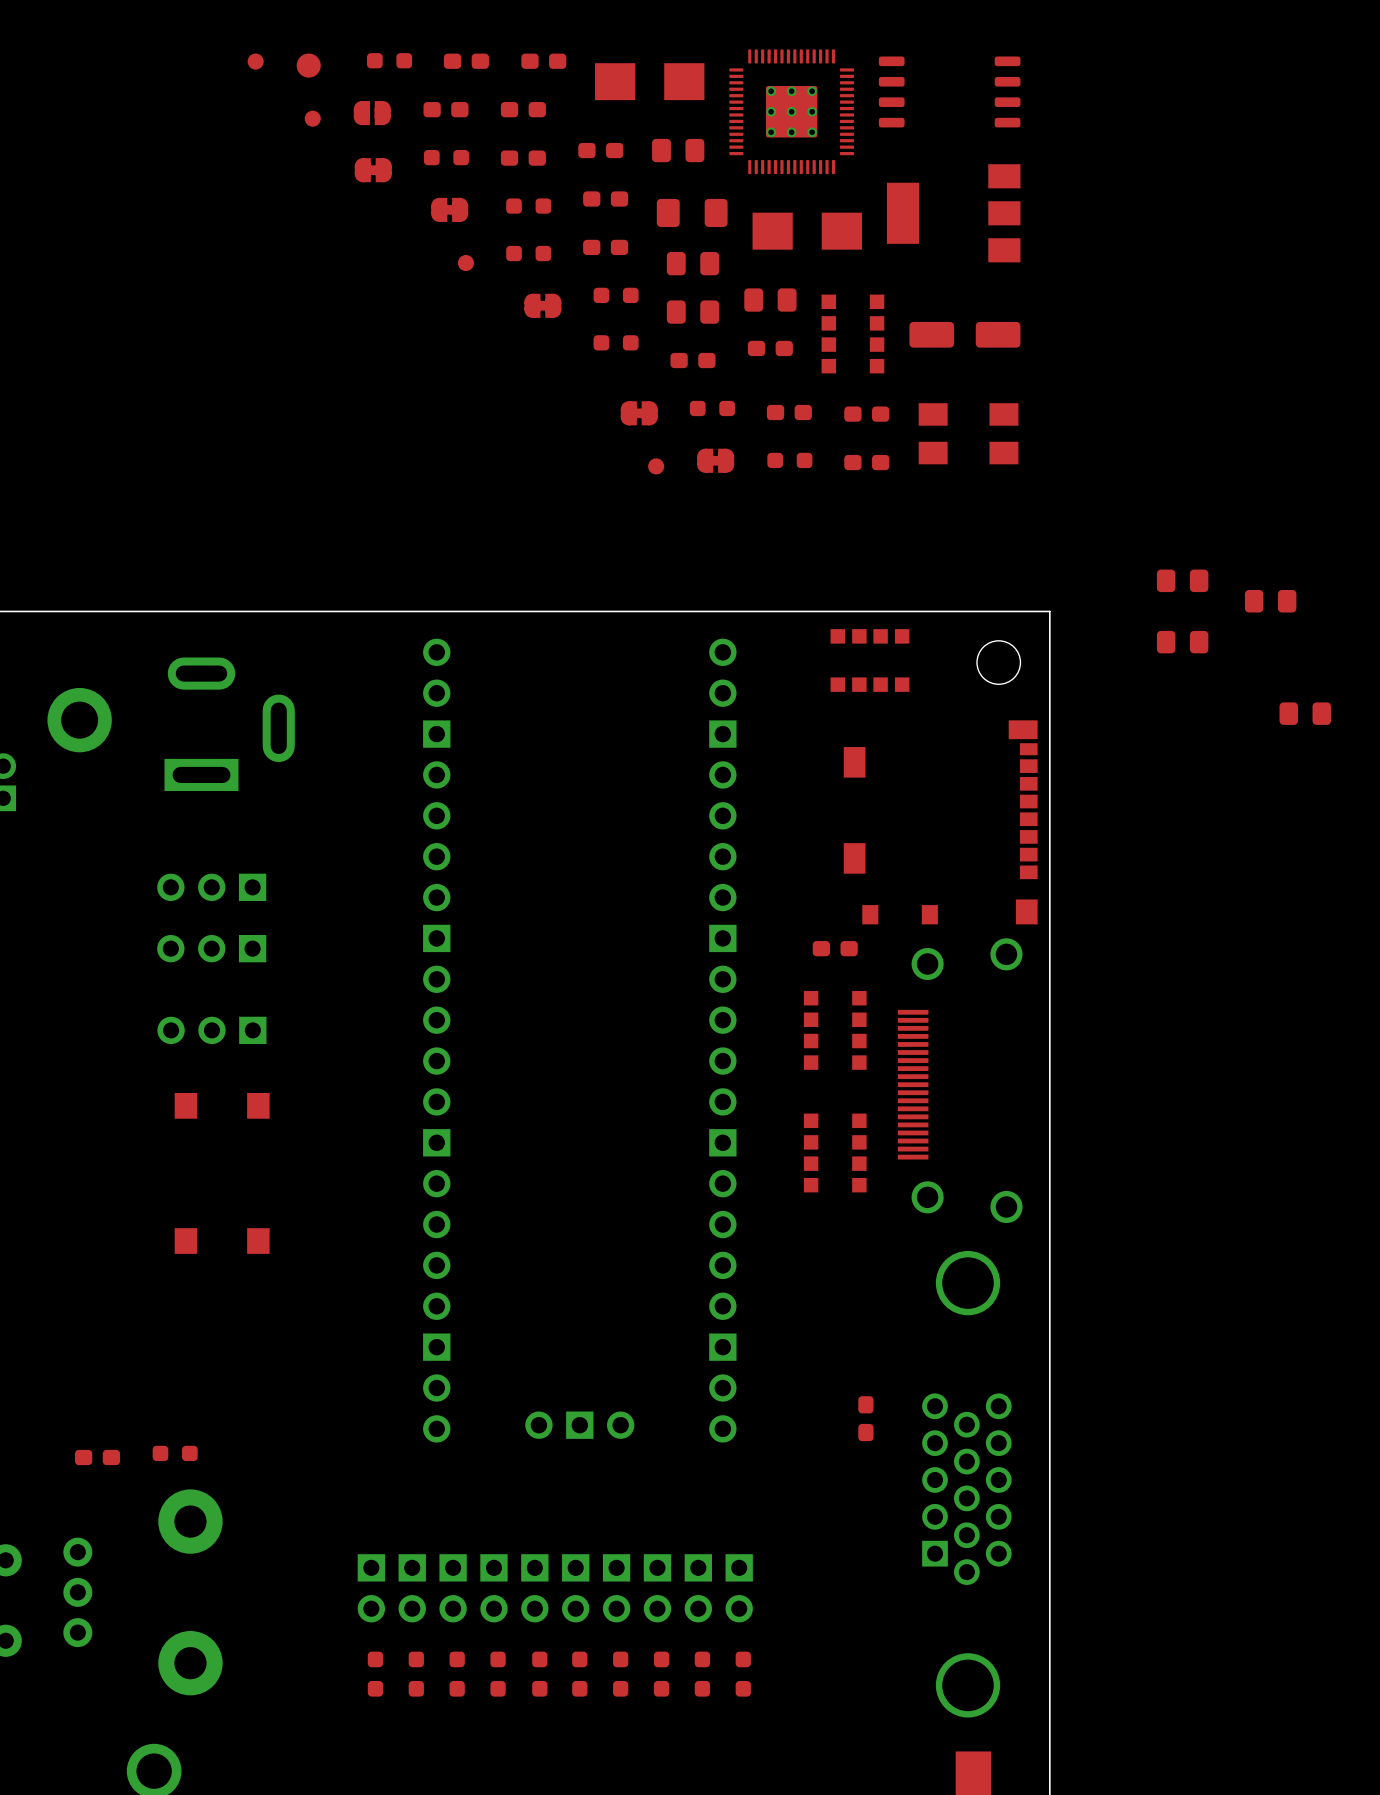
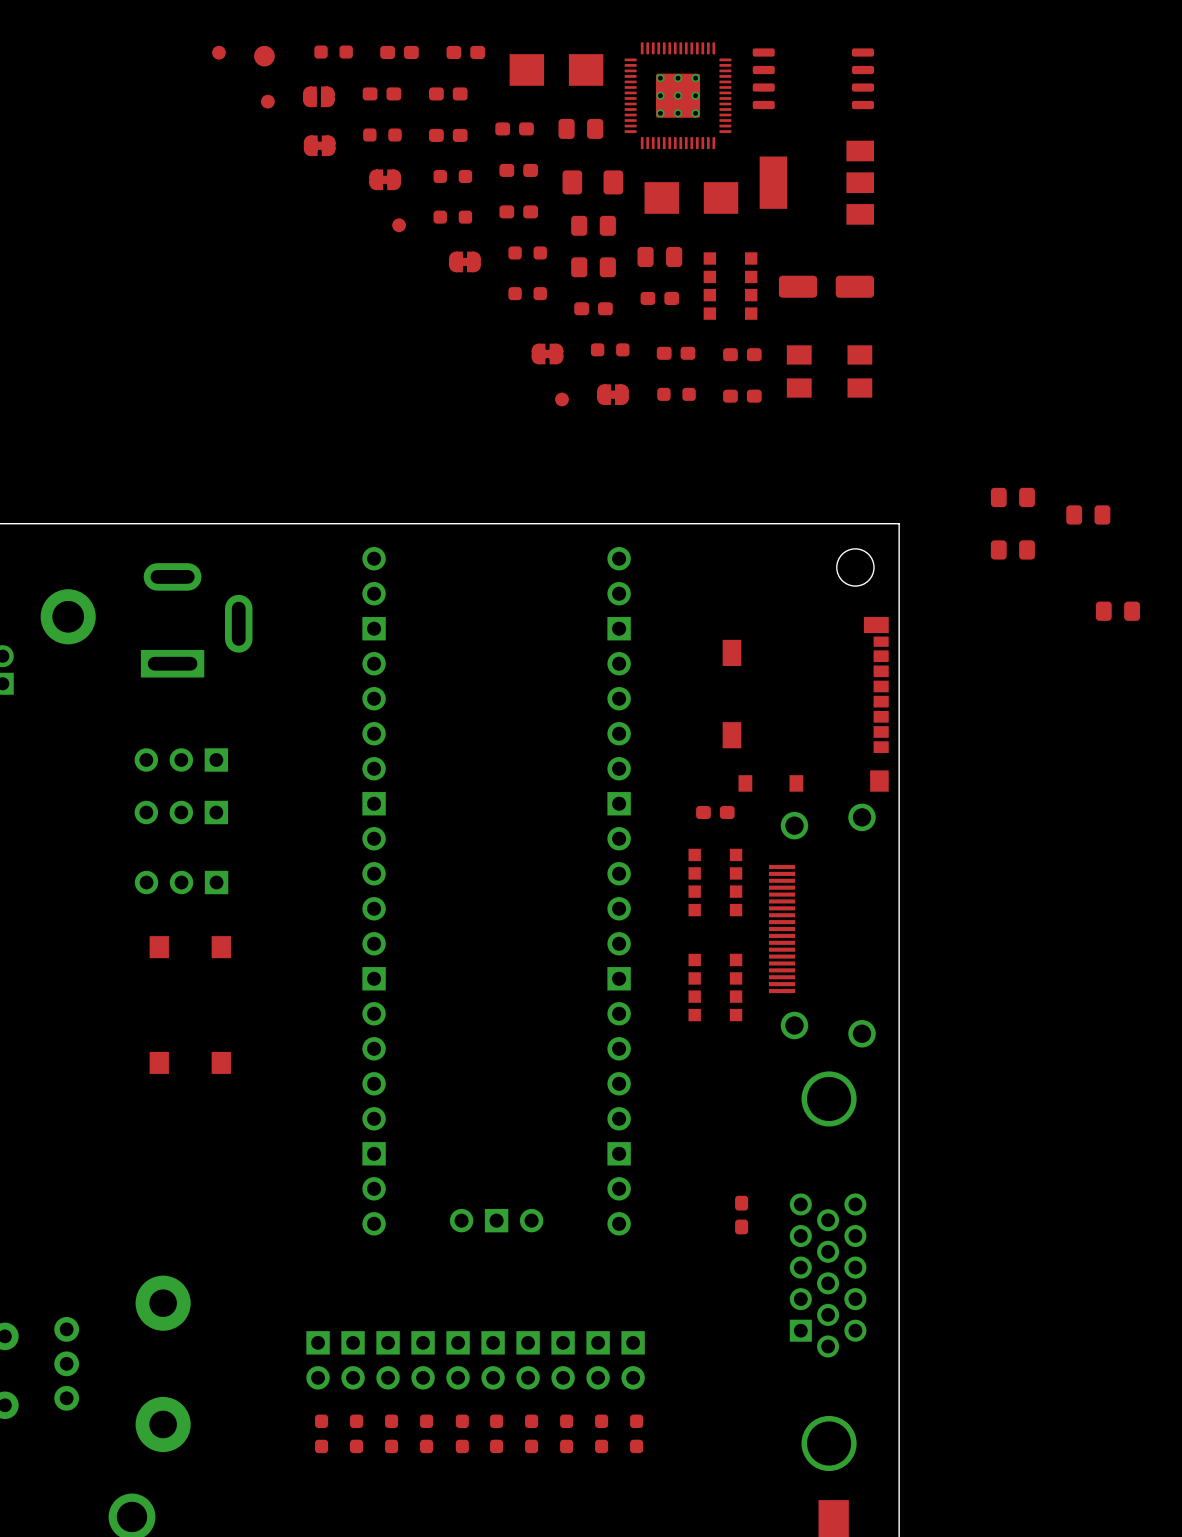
part: (869, 660) -> none
part: (175, 1453) -> none
part: (97, 1457) -> none

